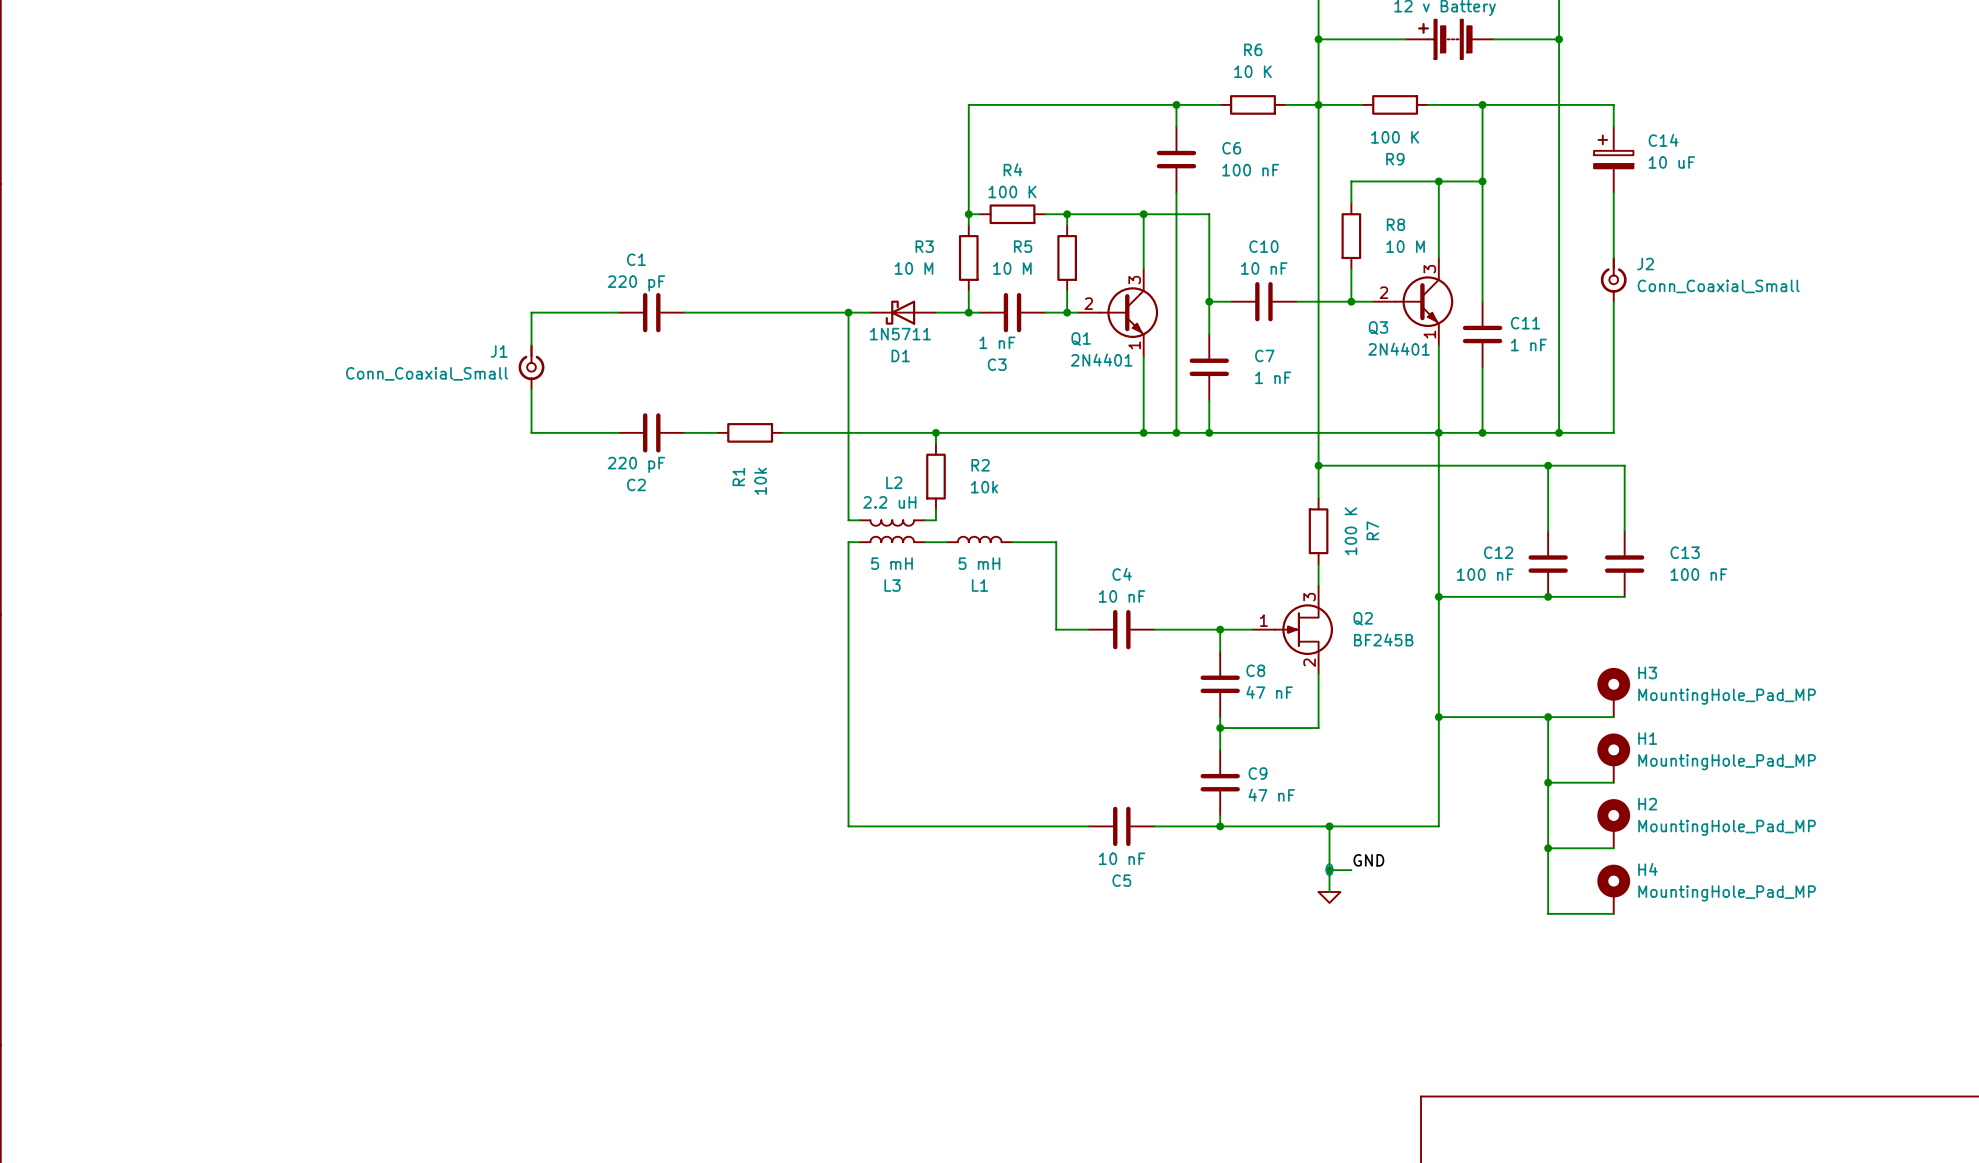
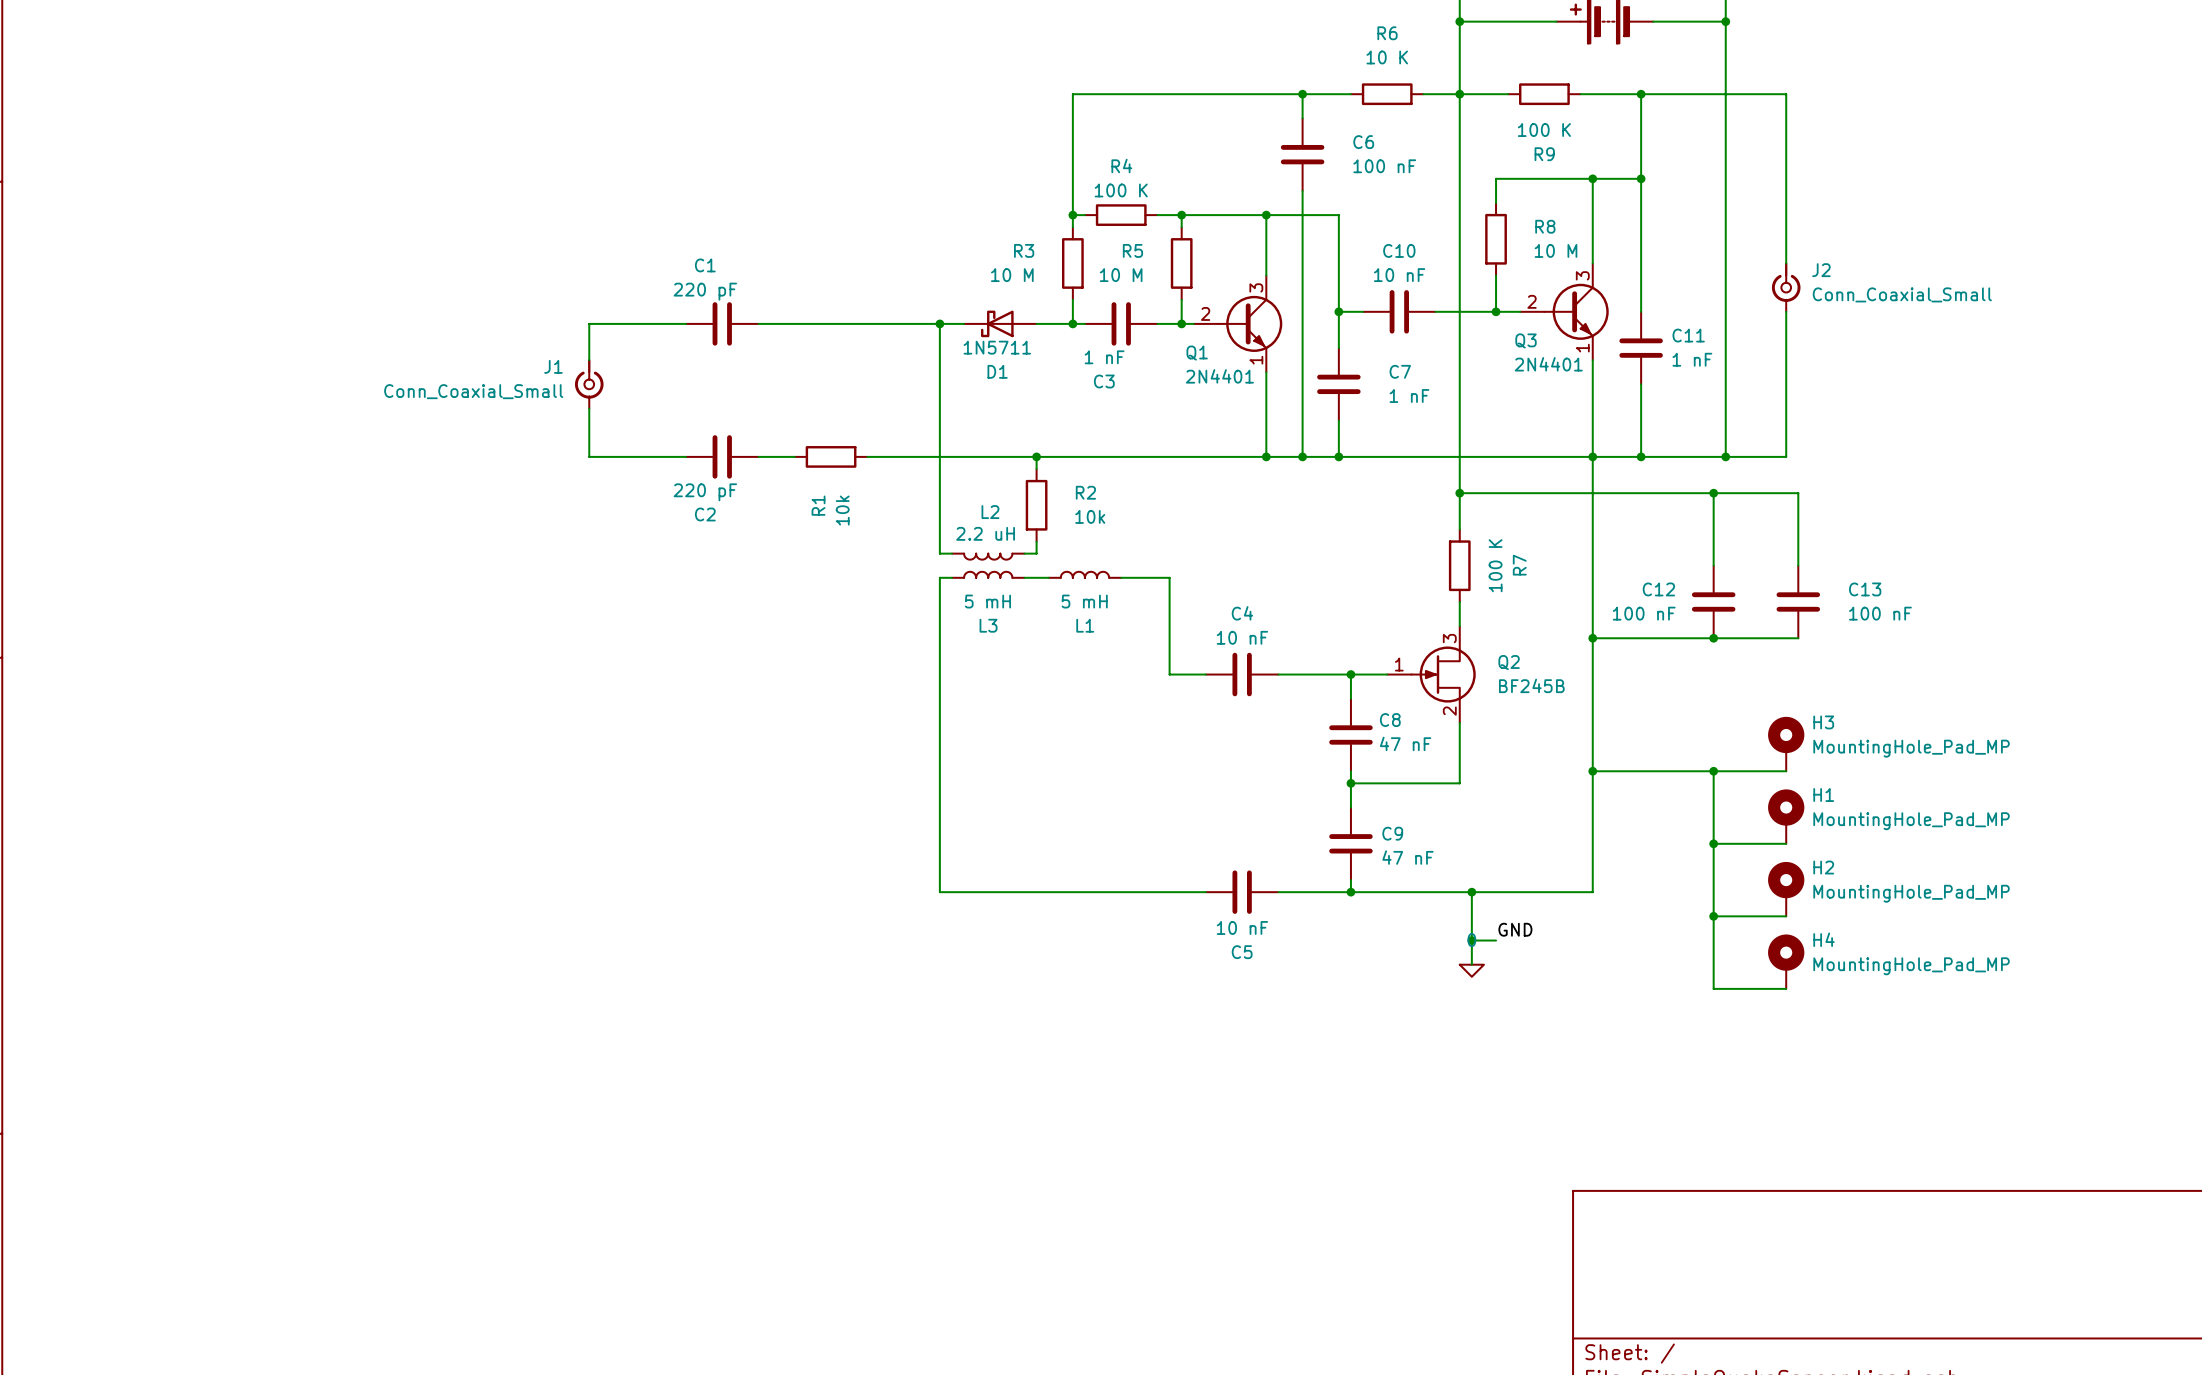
C14: 10 uF (1613, 159) -> none

